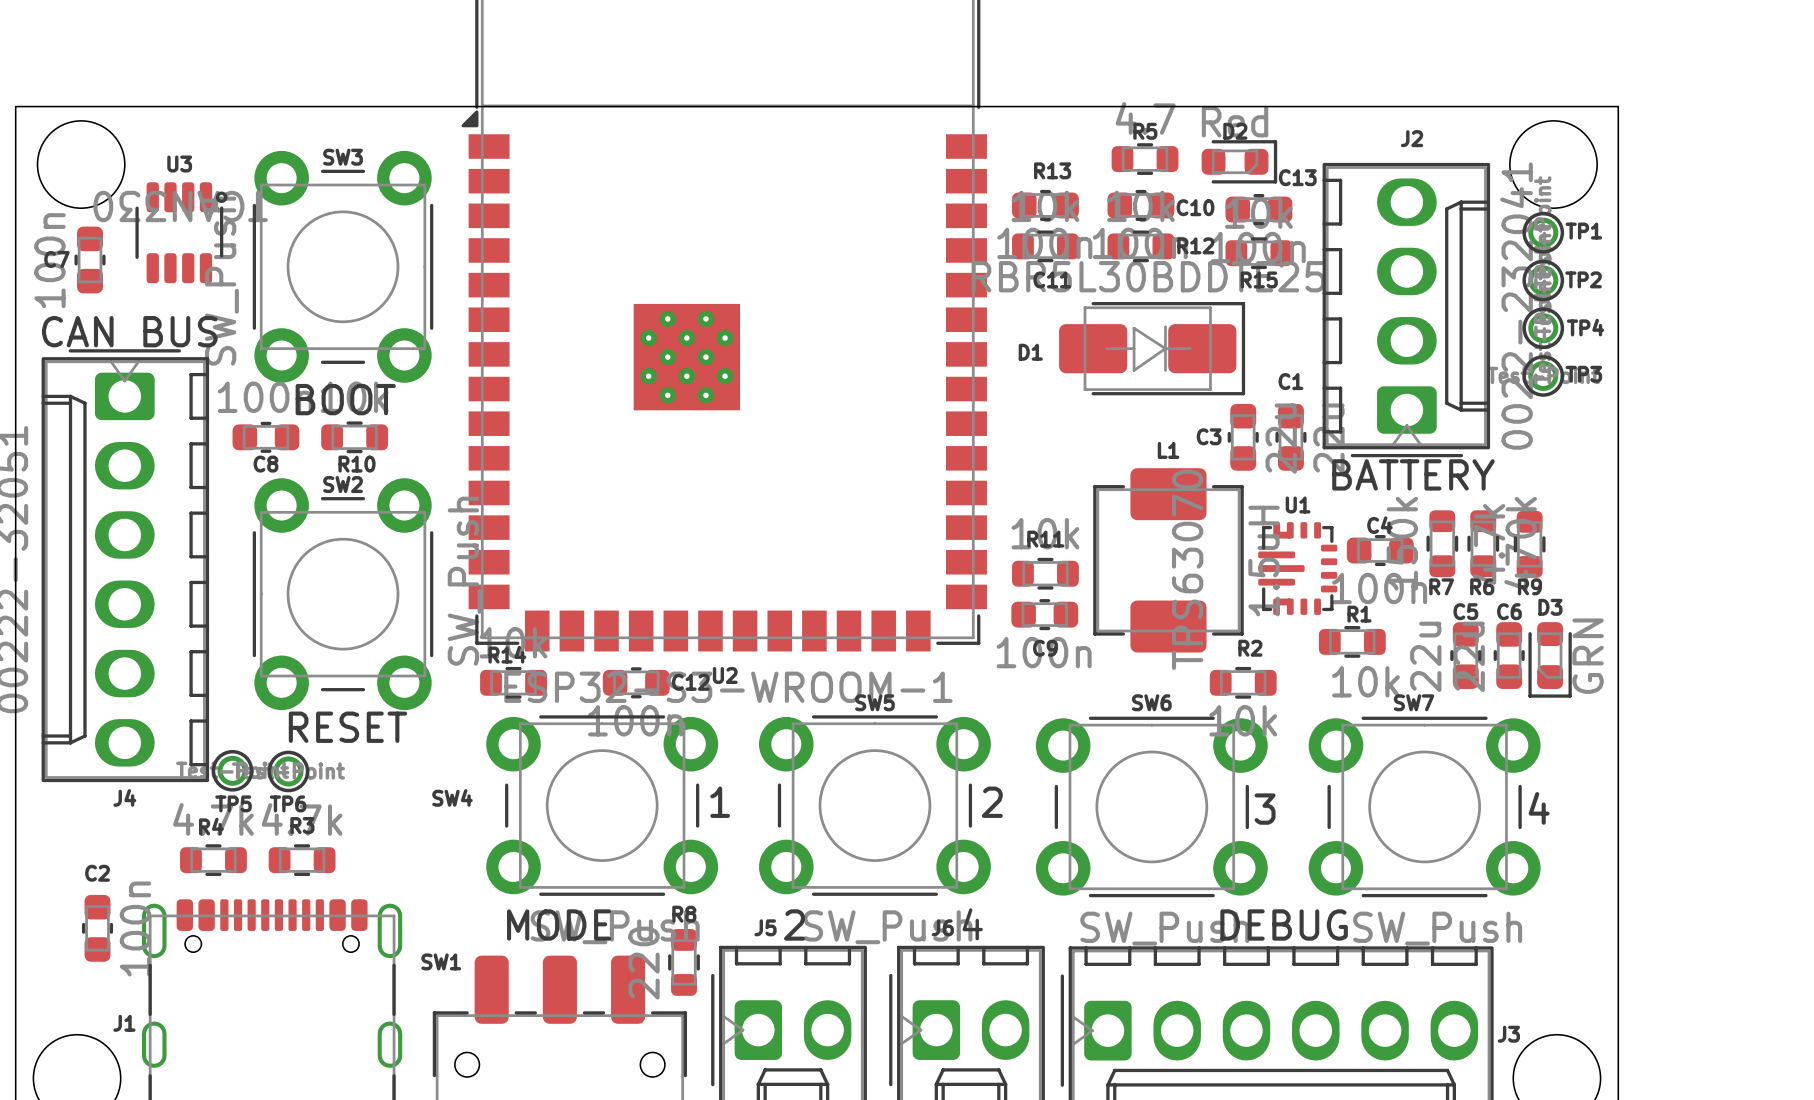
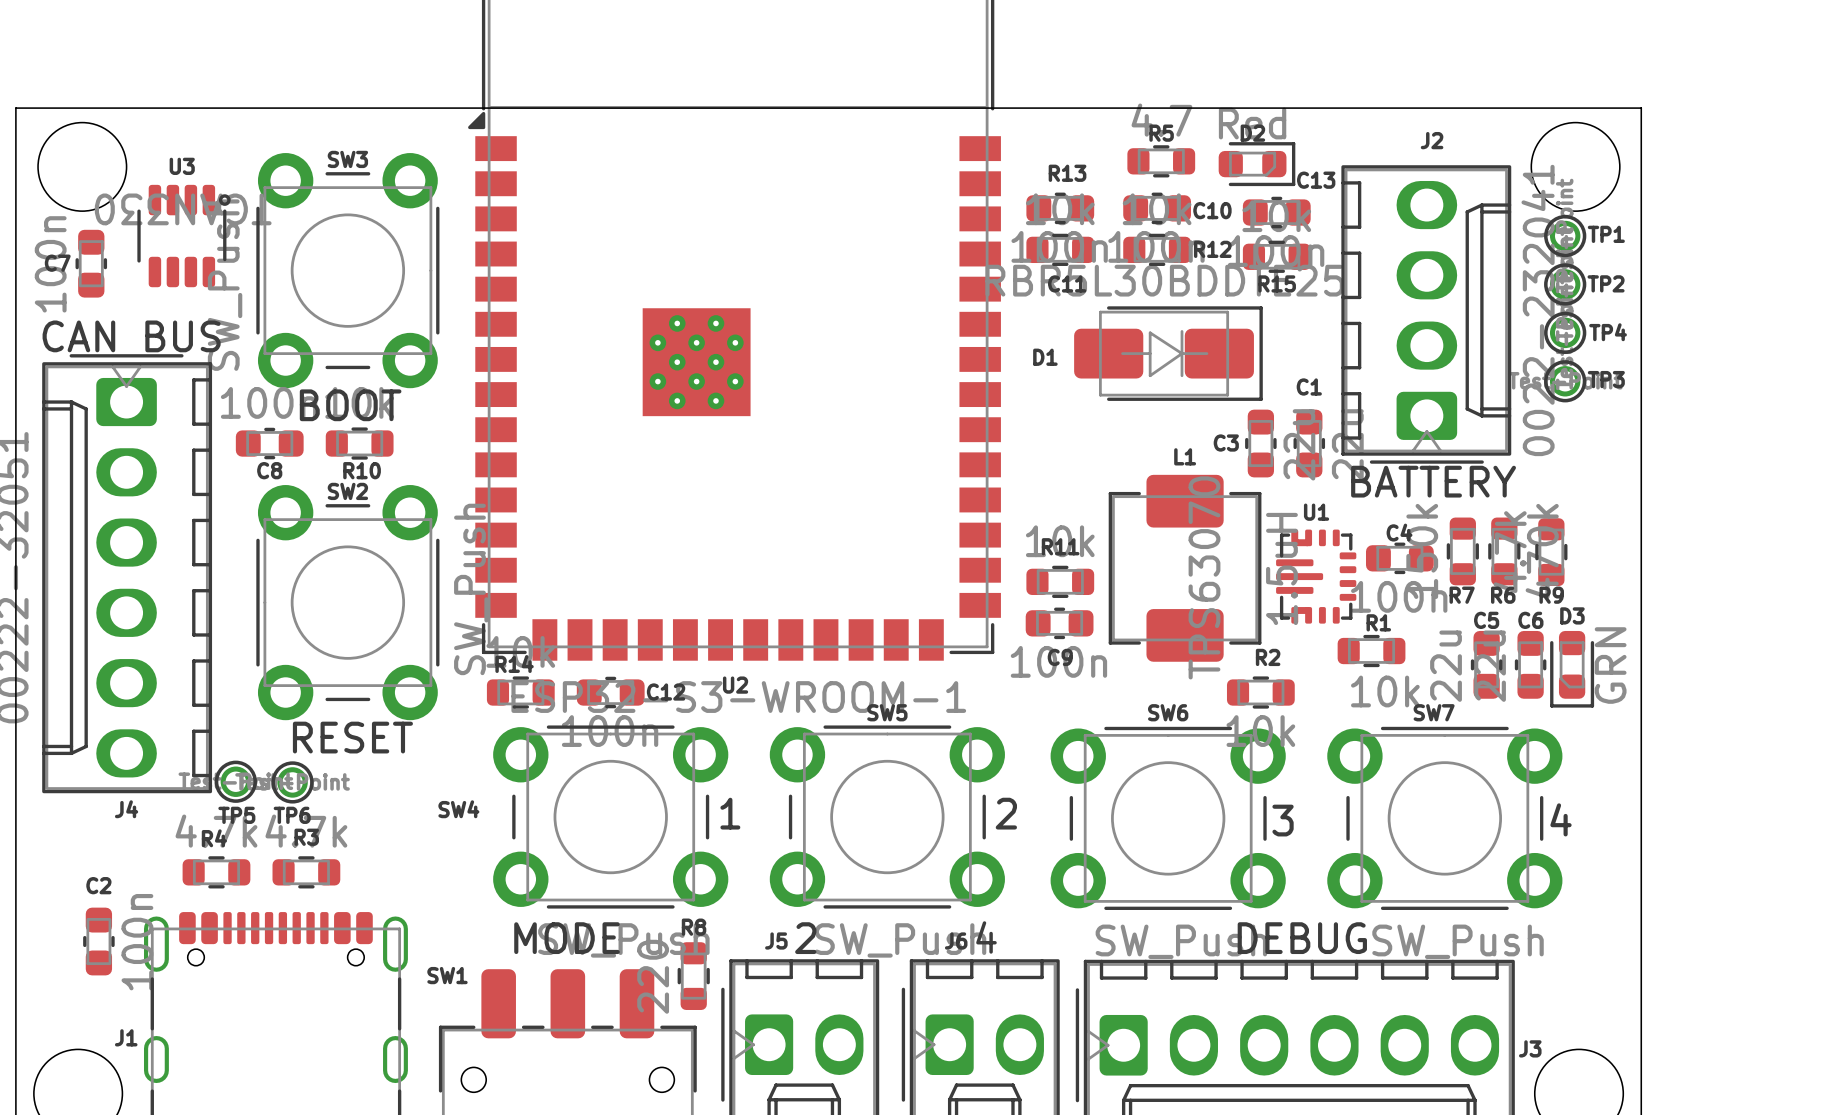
C12 position: (636, 682) -> (610, 692)

